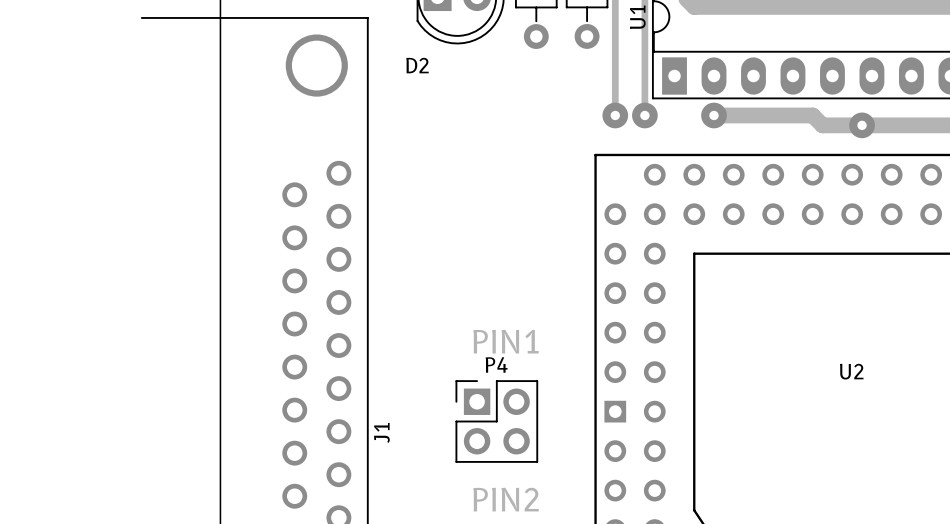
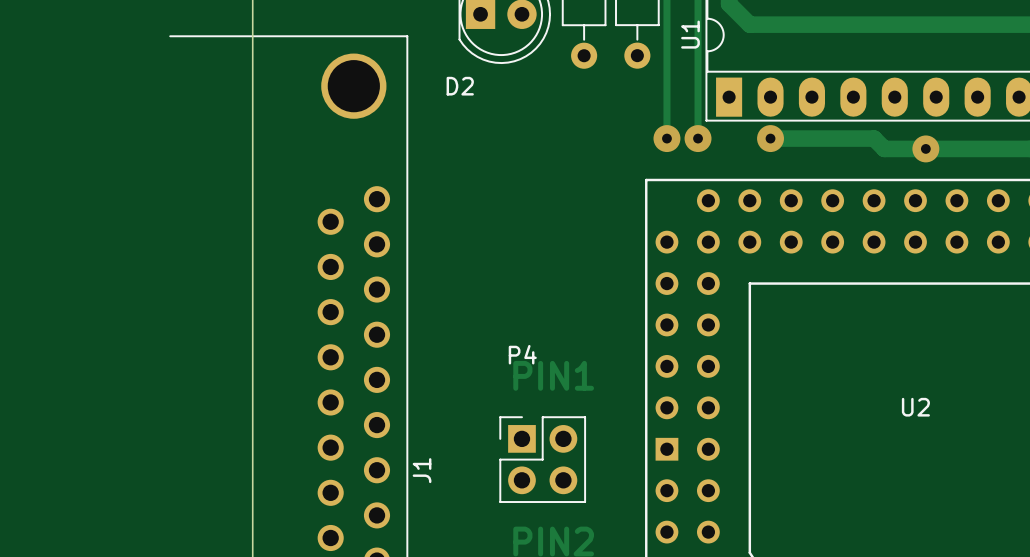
P4 name position: P4 (496, 364) -> P4 (522, 354)

